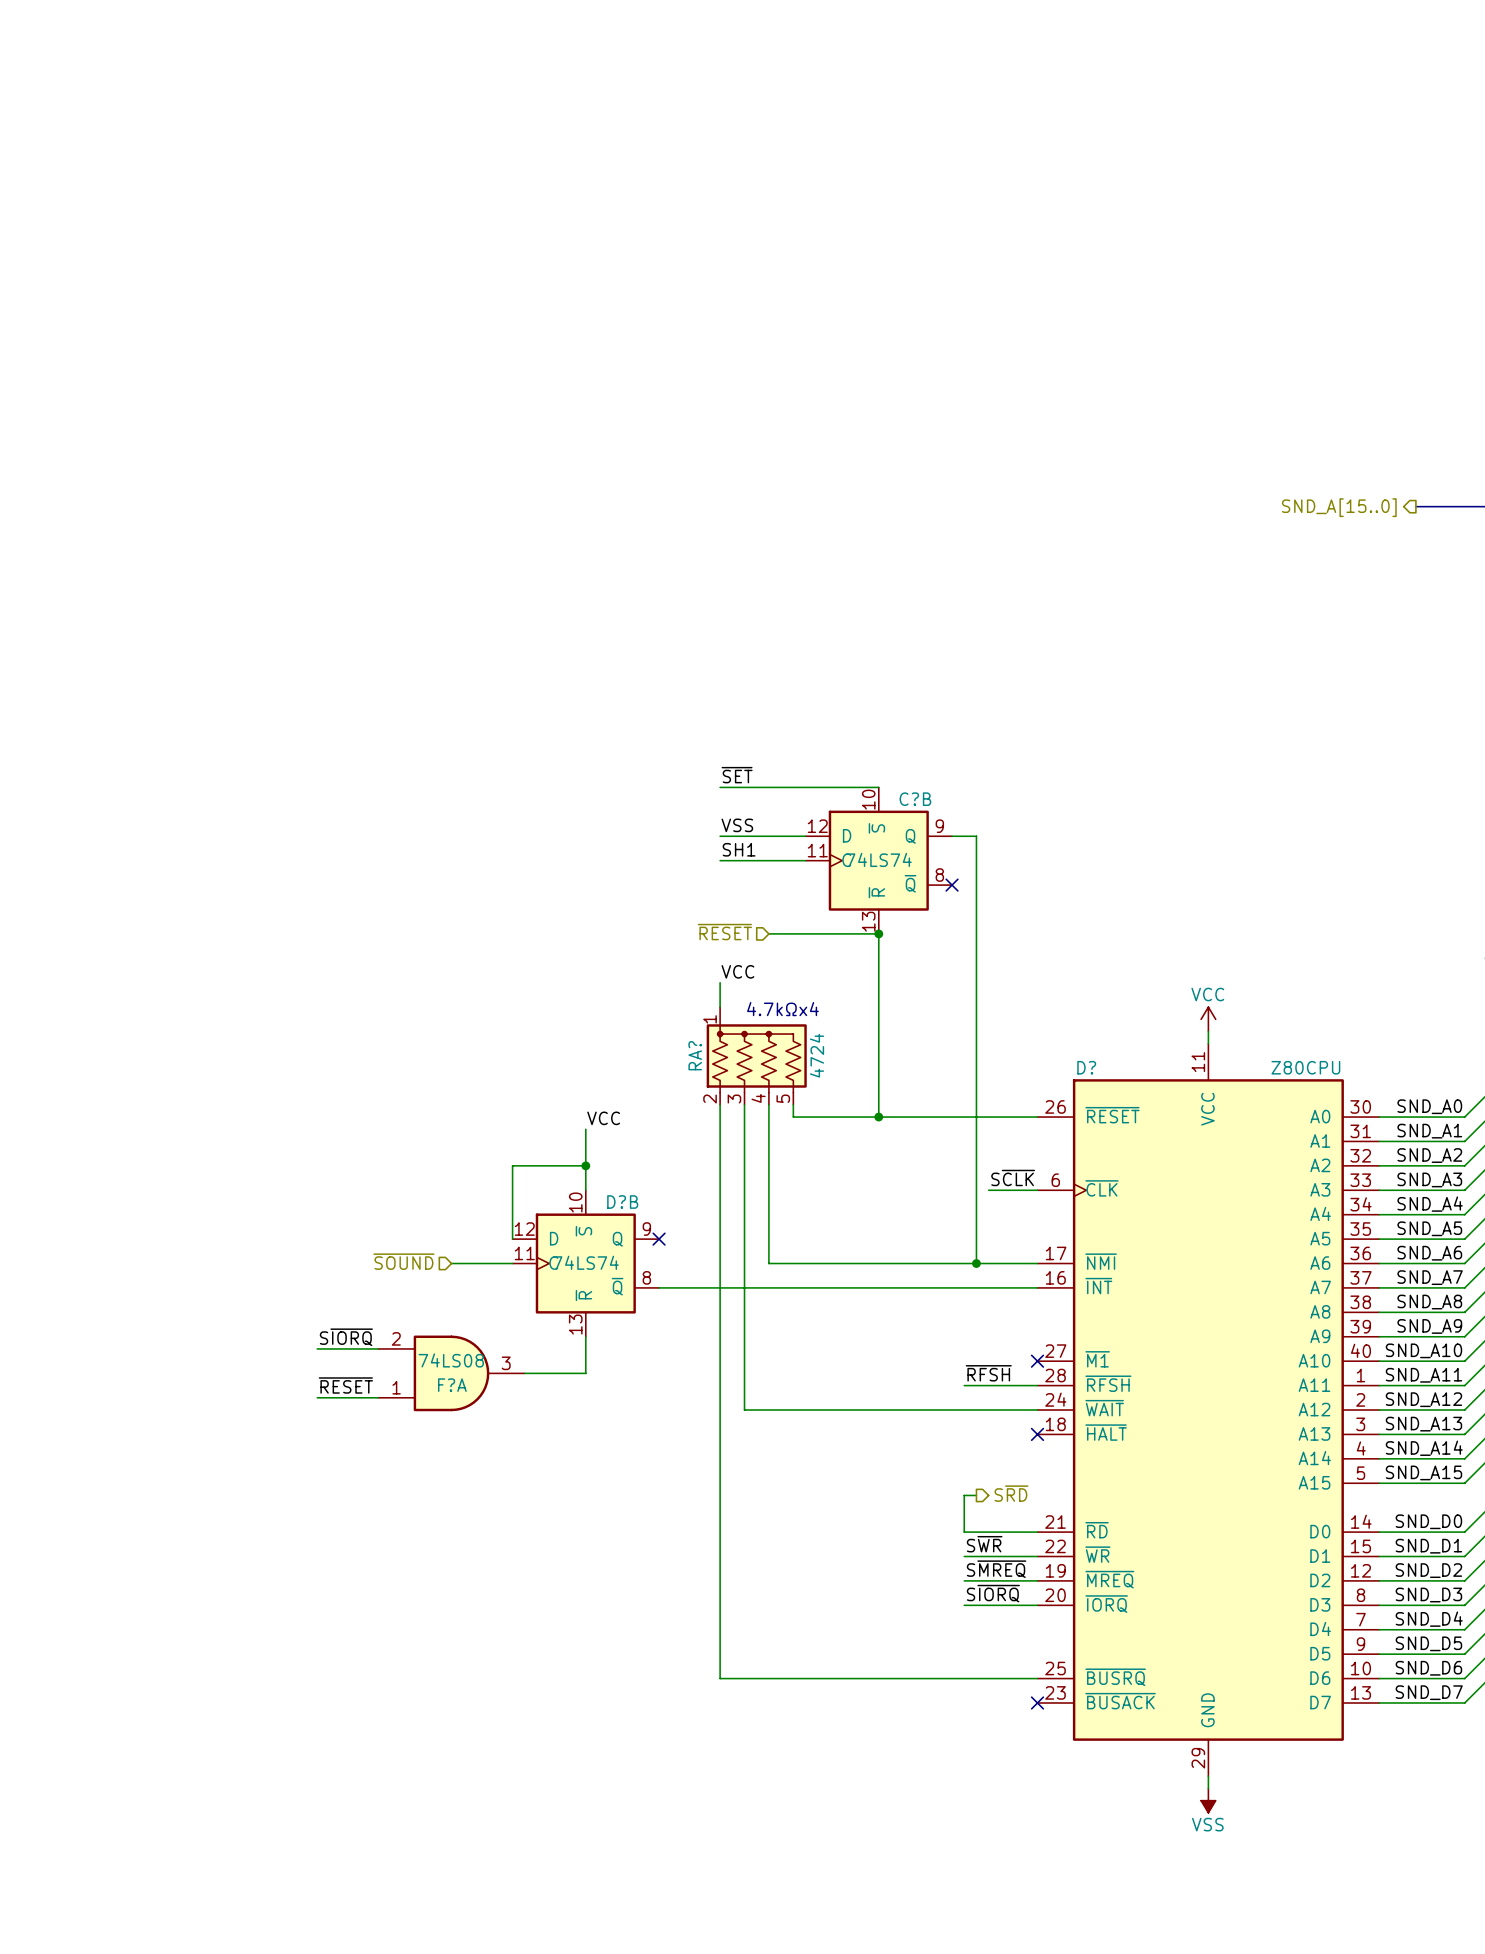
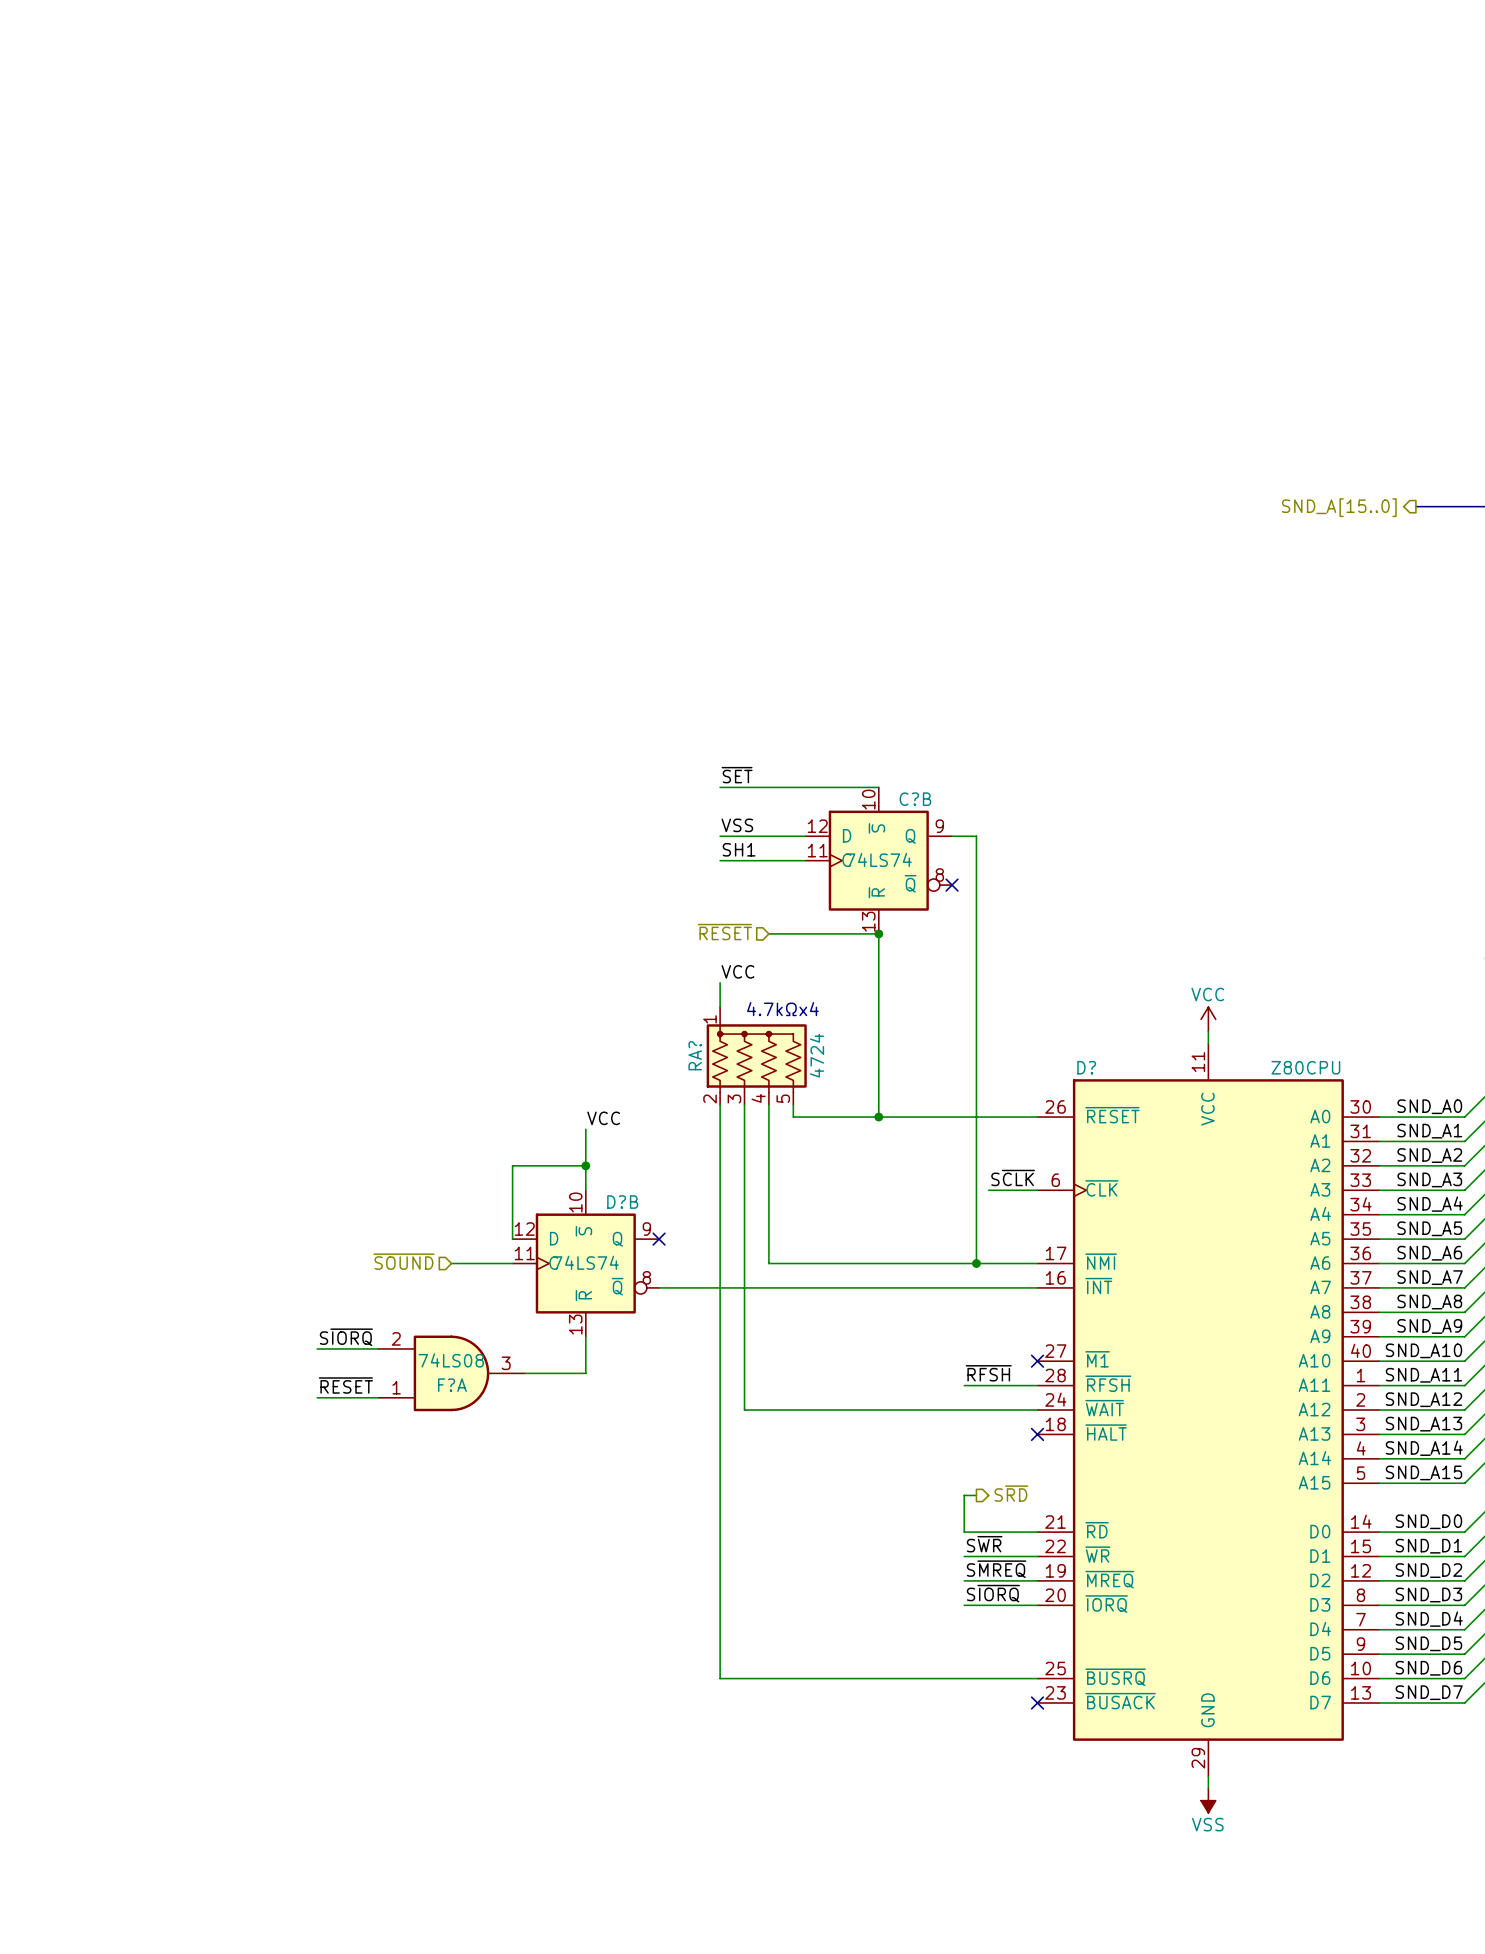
C?B symbol: [805, 787, 953, 934] -> [805, 787, 953, 934]
D?B symbol: [512, 1190, 660, 1337] -> [512, 1190, 660, 1337]

